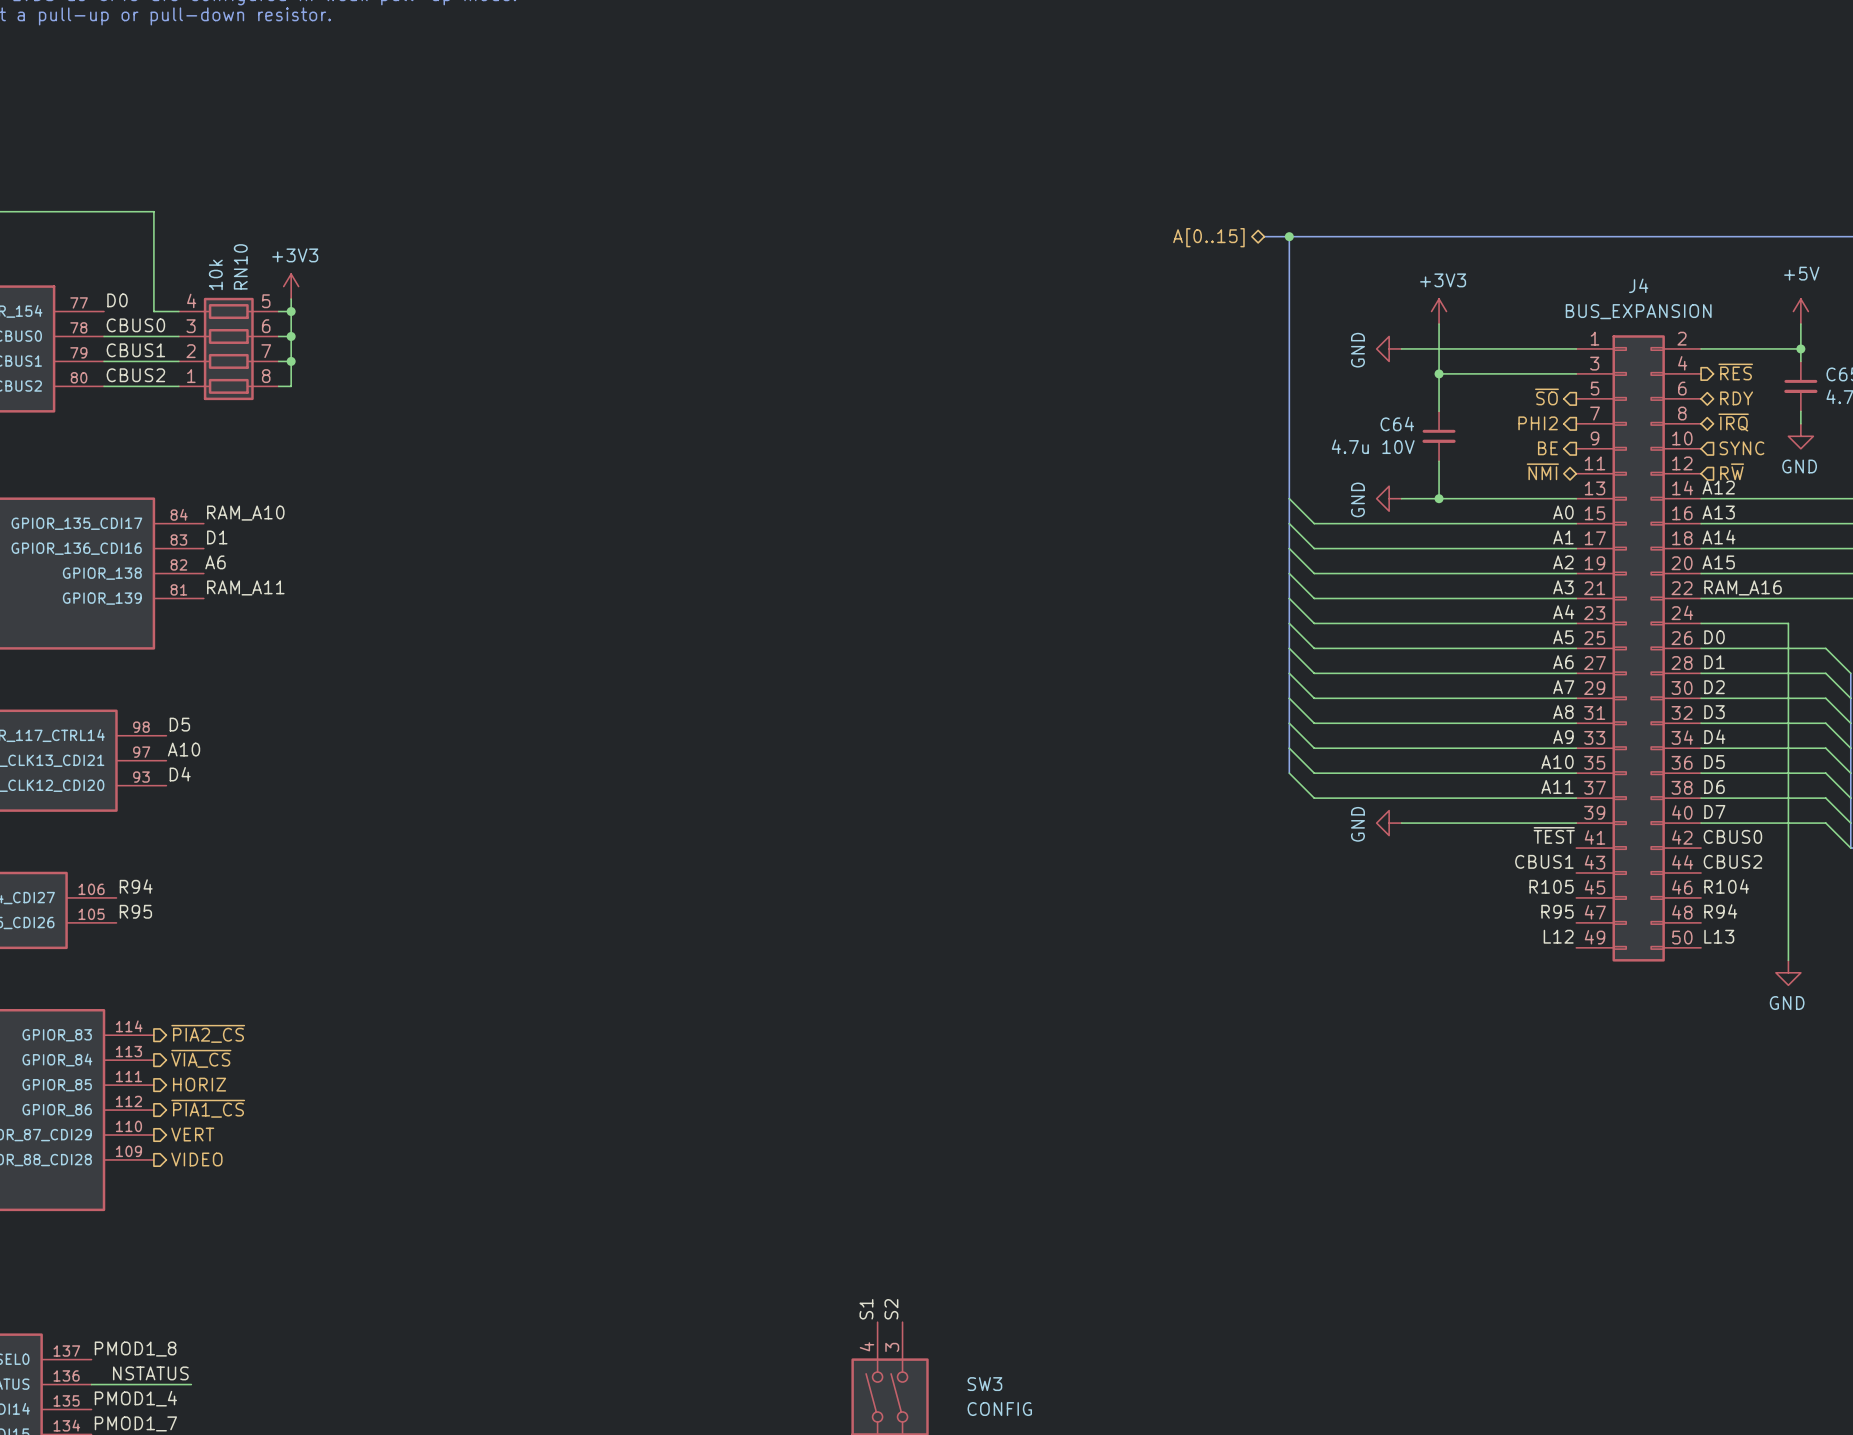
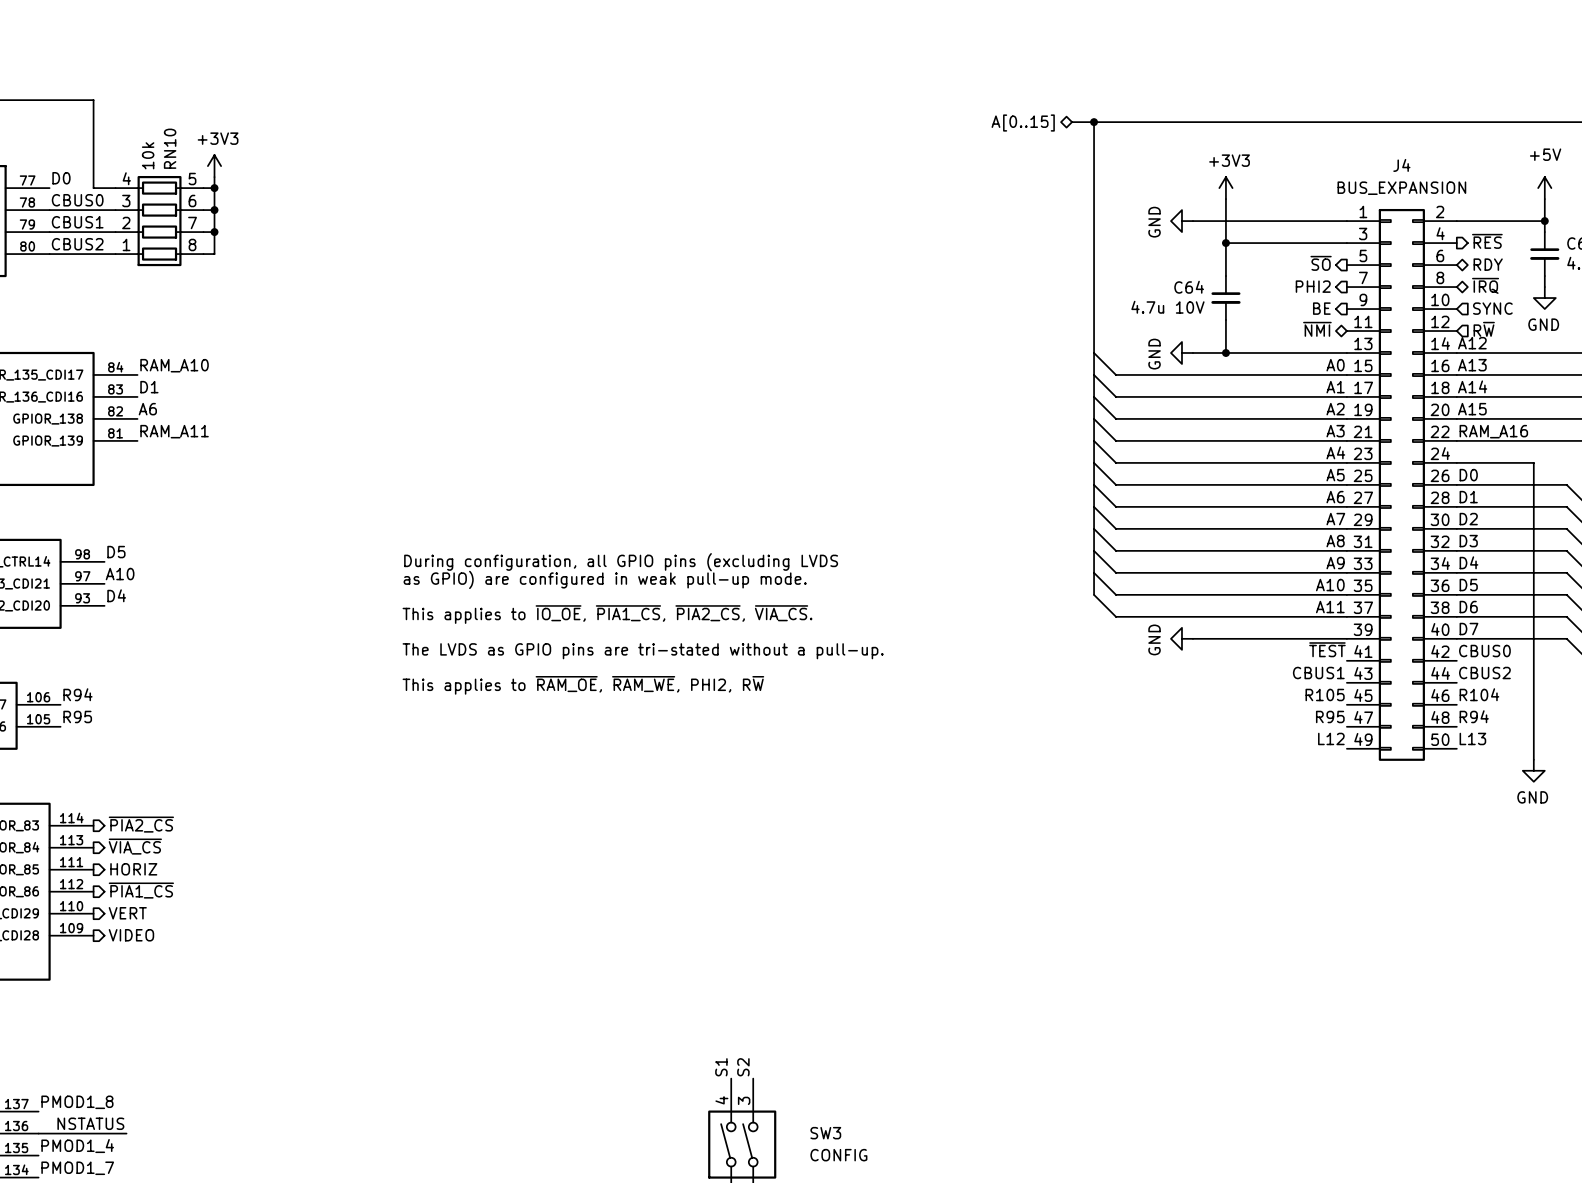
text: none -> During configuration, all GPIO pins (excluding LVDS (621, 562)
text: none -> as GPIO) are configured in weak pull-up mode. (605, 579)
text: none -> This applies to ~{IO_OE}, ~{PIA1_CS}, ~{PIA2_CS}, ~{VIA_CS}. (607, 614)
text: none -> The LVDS as GPIO pins are tri-stated without a pull-up. (643, 651)
text: none -> This applies to ~{RAM_OE}, ~{RAM_WE}, PHI2, R~{W} (583, 685)

